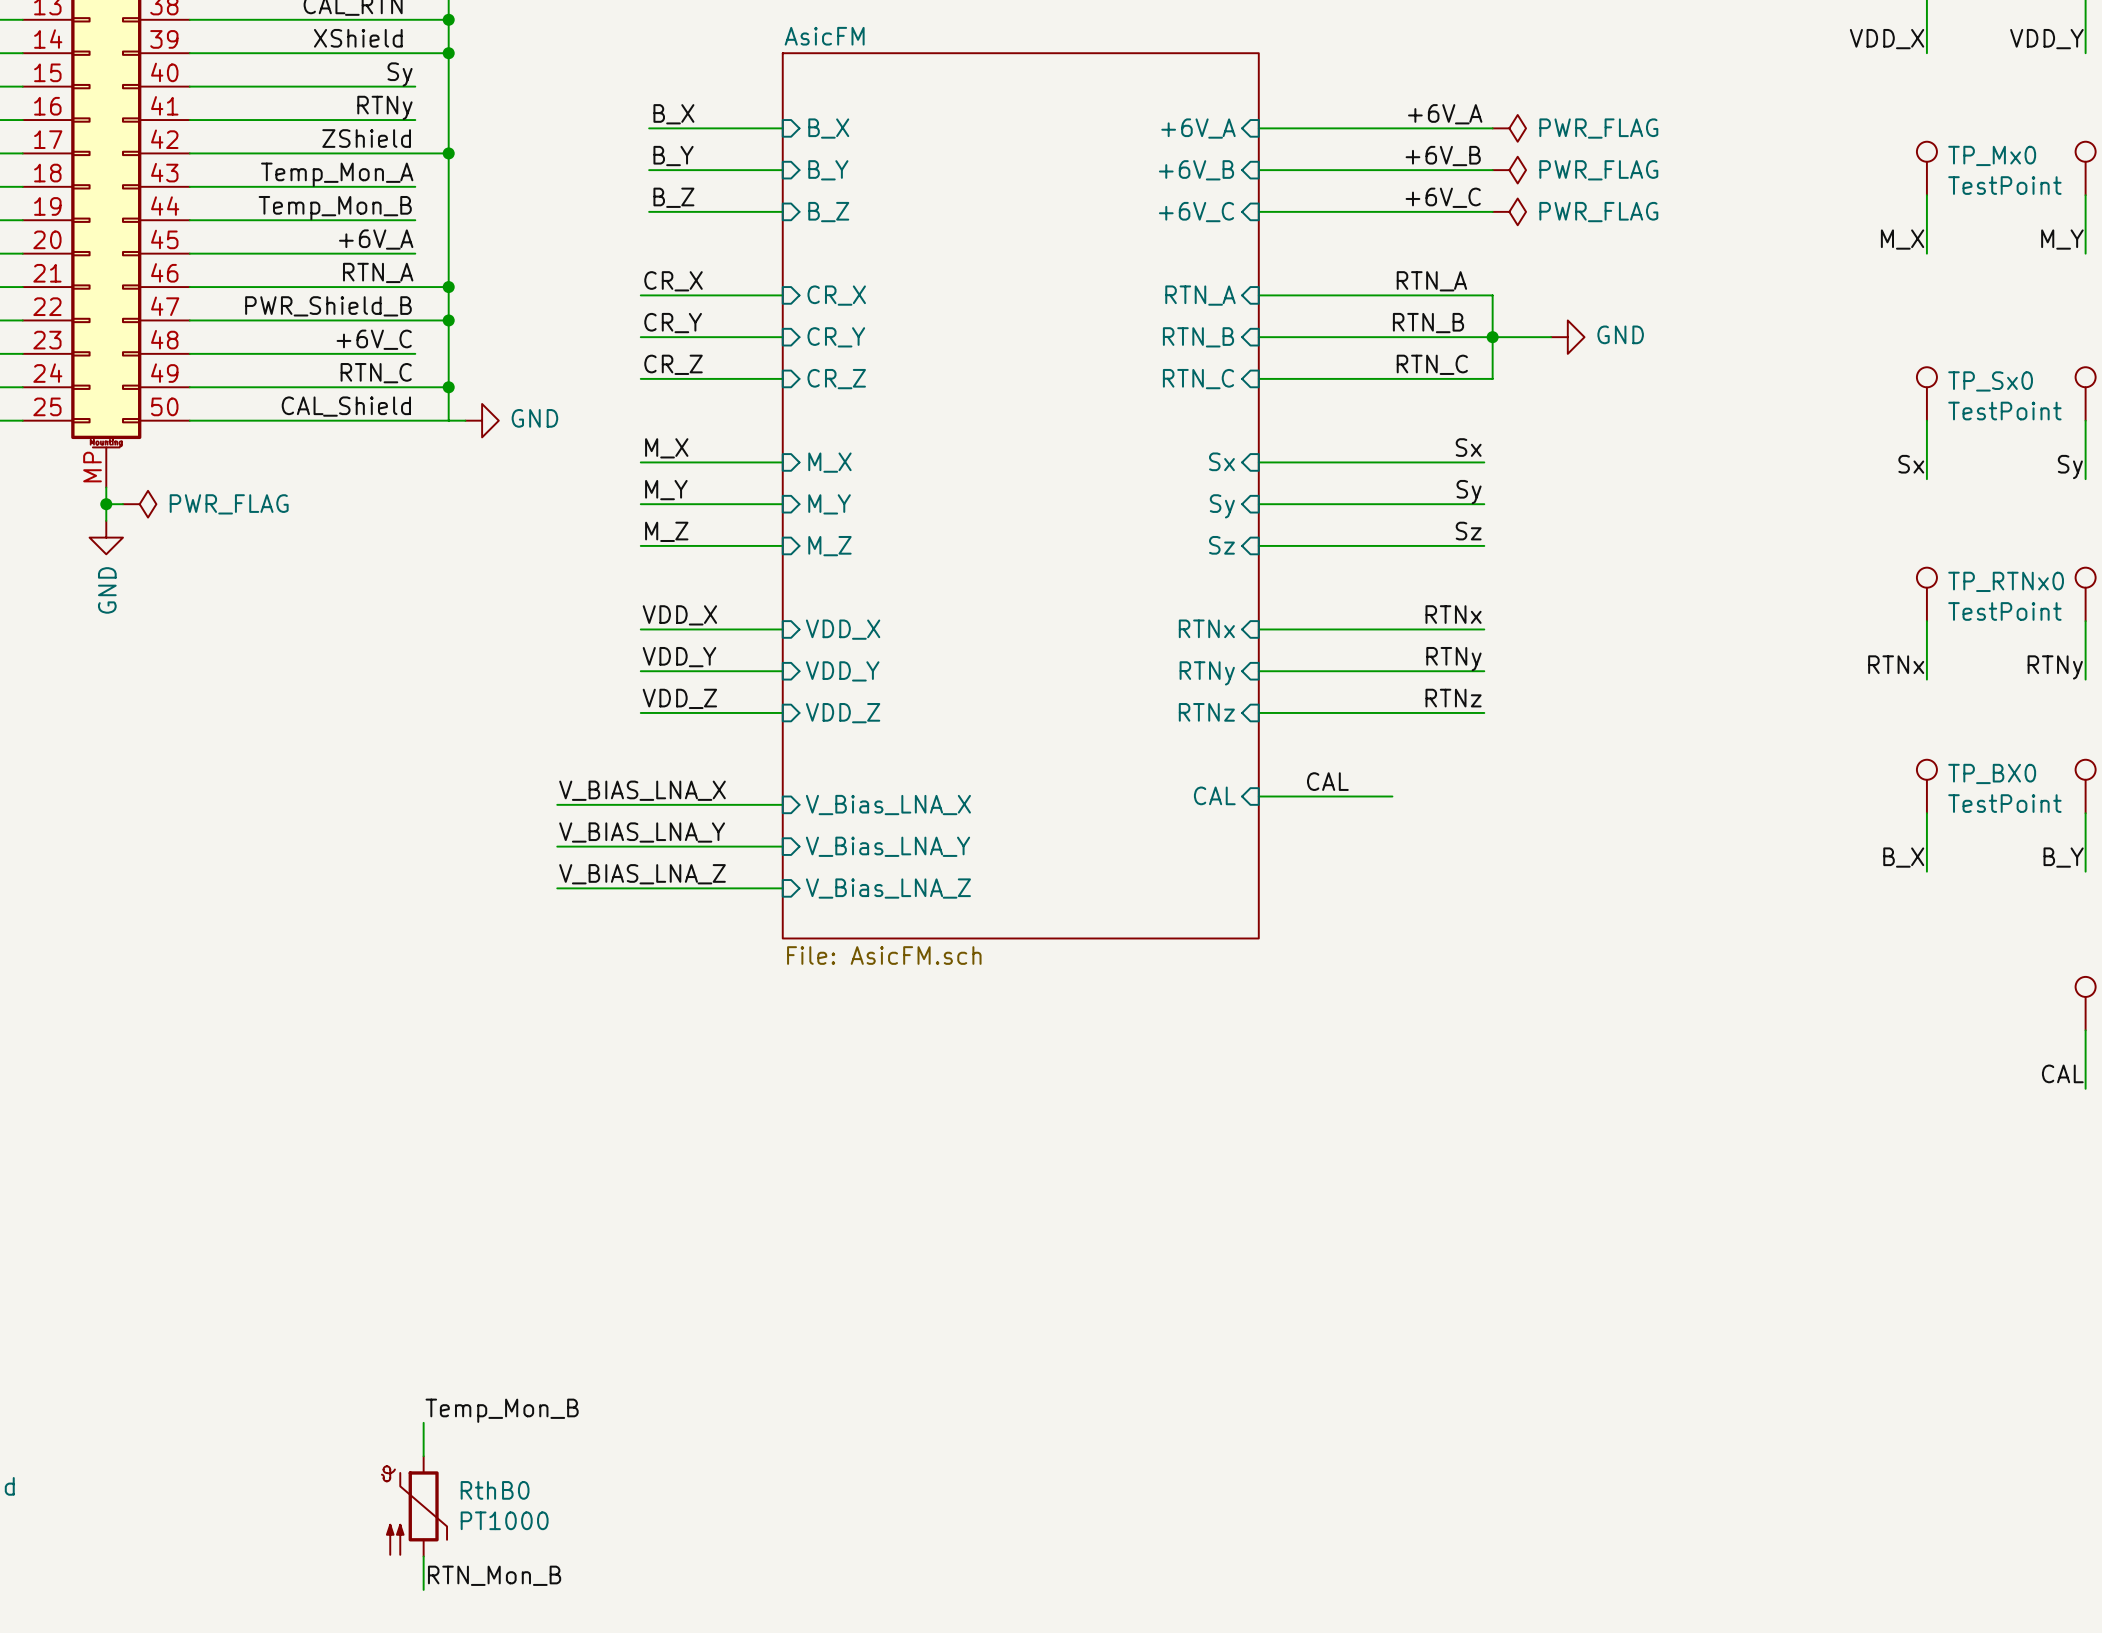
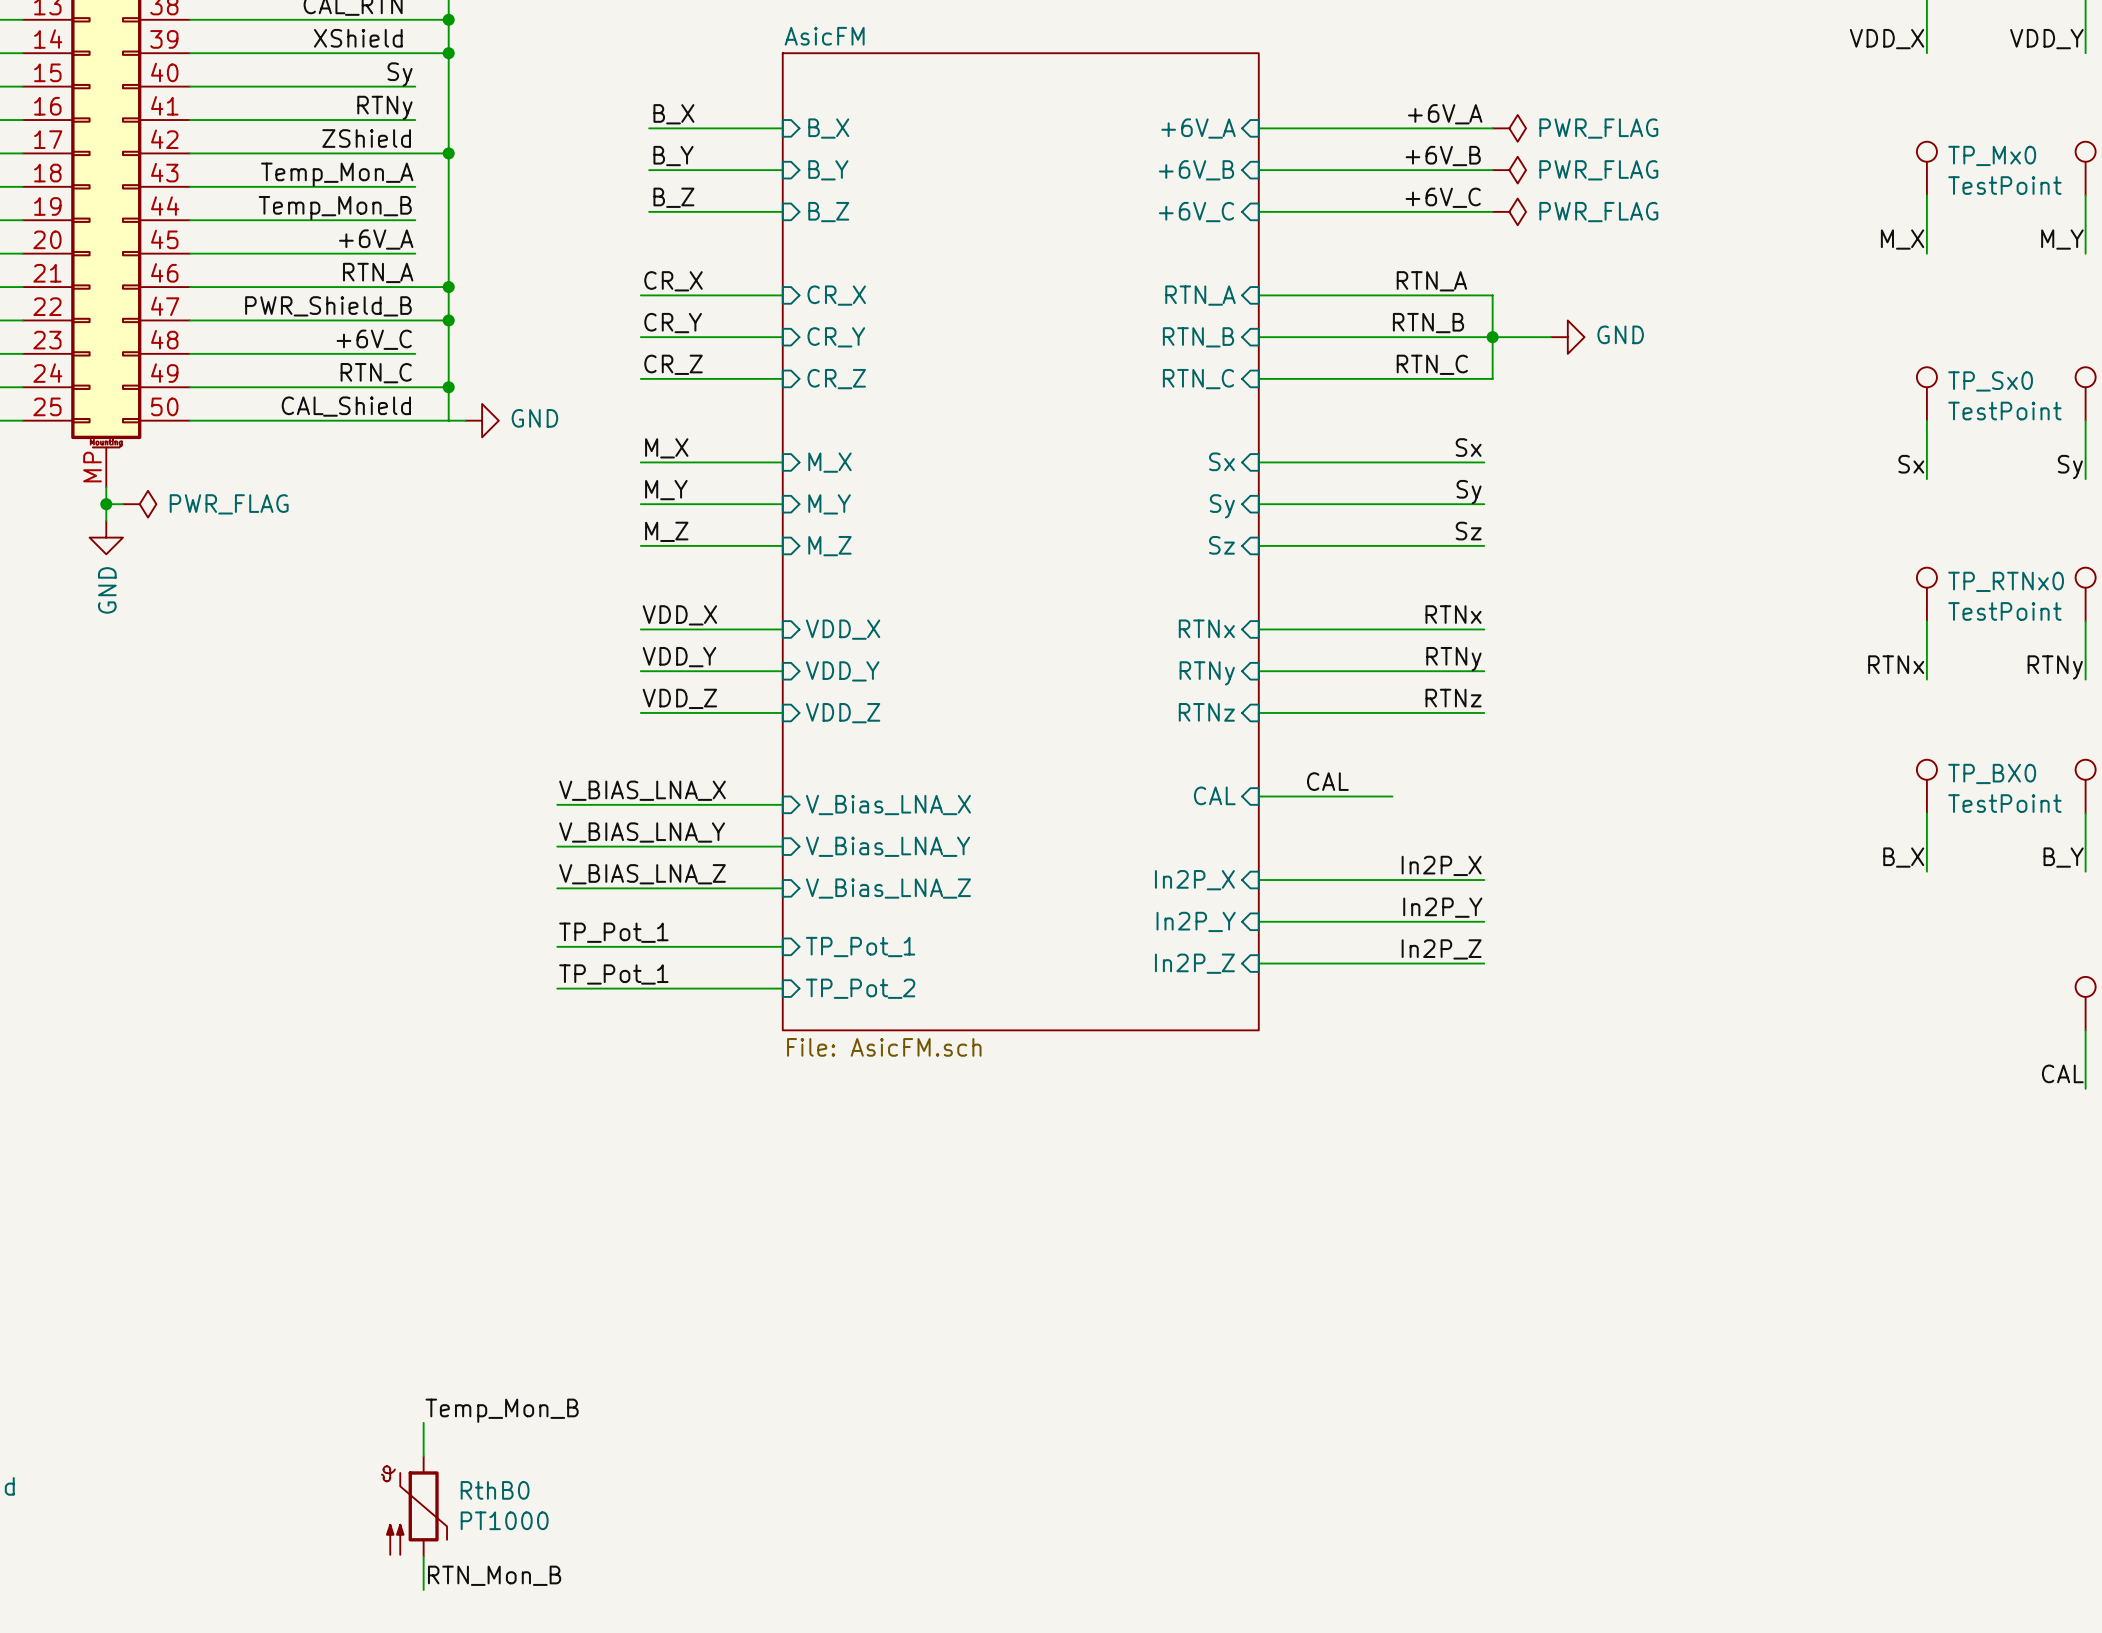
sheet AsicFM: File: AsicFM.sch (1020, 495) -> none
sheet AsicFM: none -> File: AsicFM.sch (1020, 541)
label: none -> In2P_X (1441, 865)
sheet pin: none -> In2P_X (1194, 880)
wire: none -> (1258, 880) (1484, 880)
label: none -> In2P_Y (1442, 907)
sheet pin: none -> In2P_Y (1196, 921)
wire: none -> (1258, 921) (1484, 921)
label: none -> TP_Pot_1 (613, 932)
wire: none -> (557, 946) (782, 946)
sheet pin: none -> TP_Pot_1 (860, 947)
label: none -> In2P_Z (1441, 949)
sheet pin: none -> In2P_Z (1194, 963)
wire: none -> (1258, 963) (1484, 963)
label: none -> TP_Pot_1 (613, 974)
wire: none -> (557, 988) (782, 988)
sheet pin: none -> TP_Pot_2 (860, 988)

